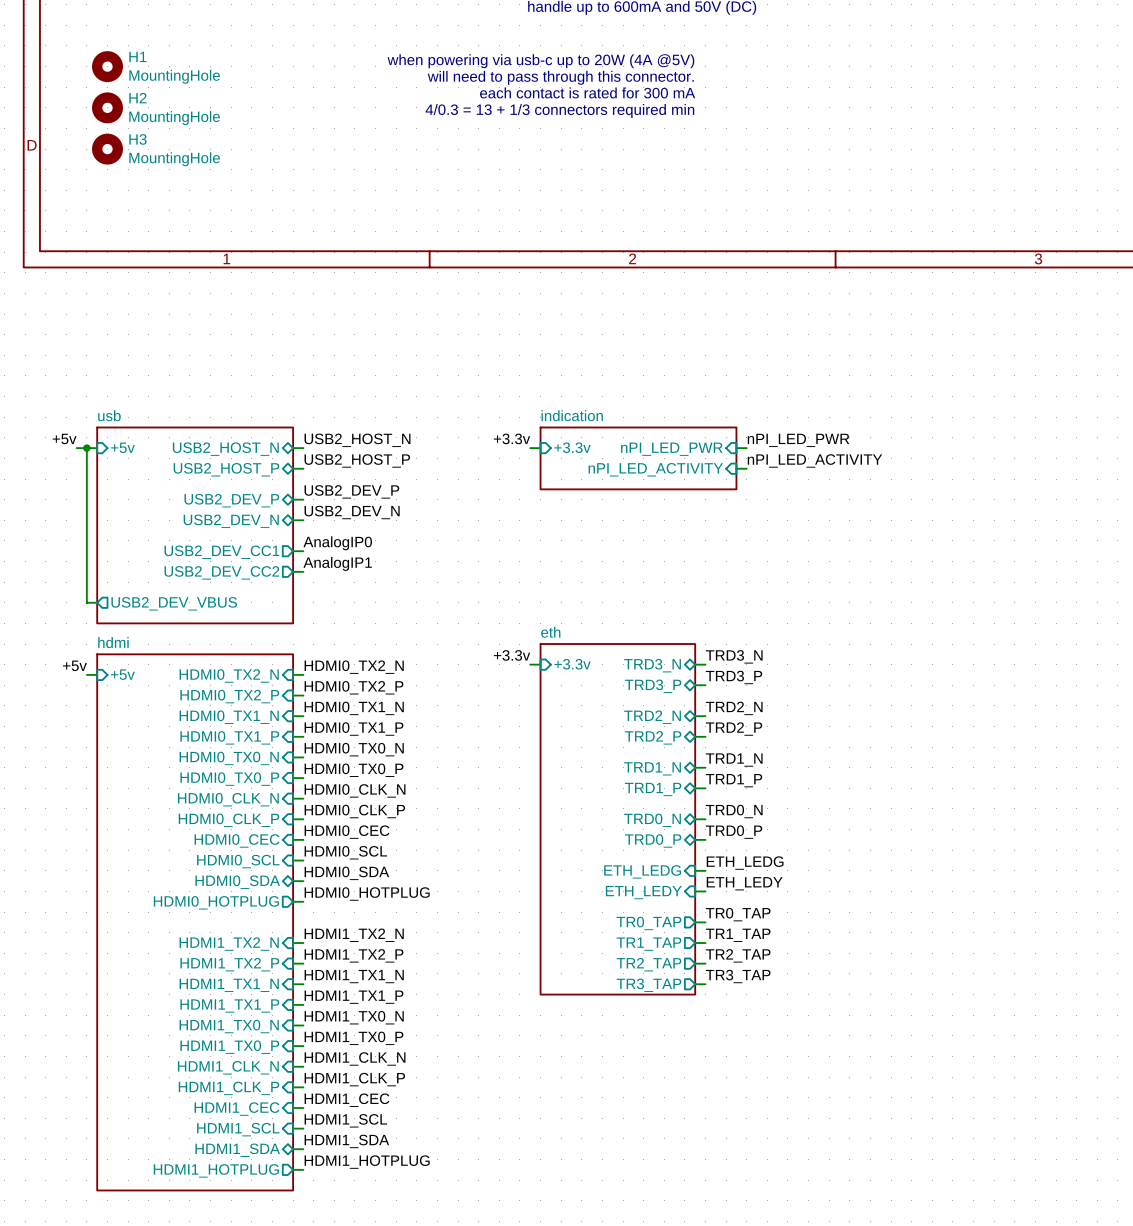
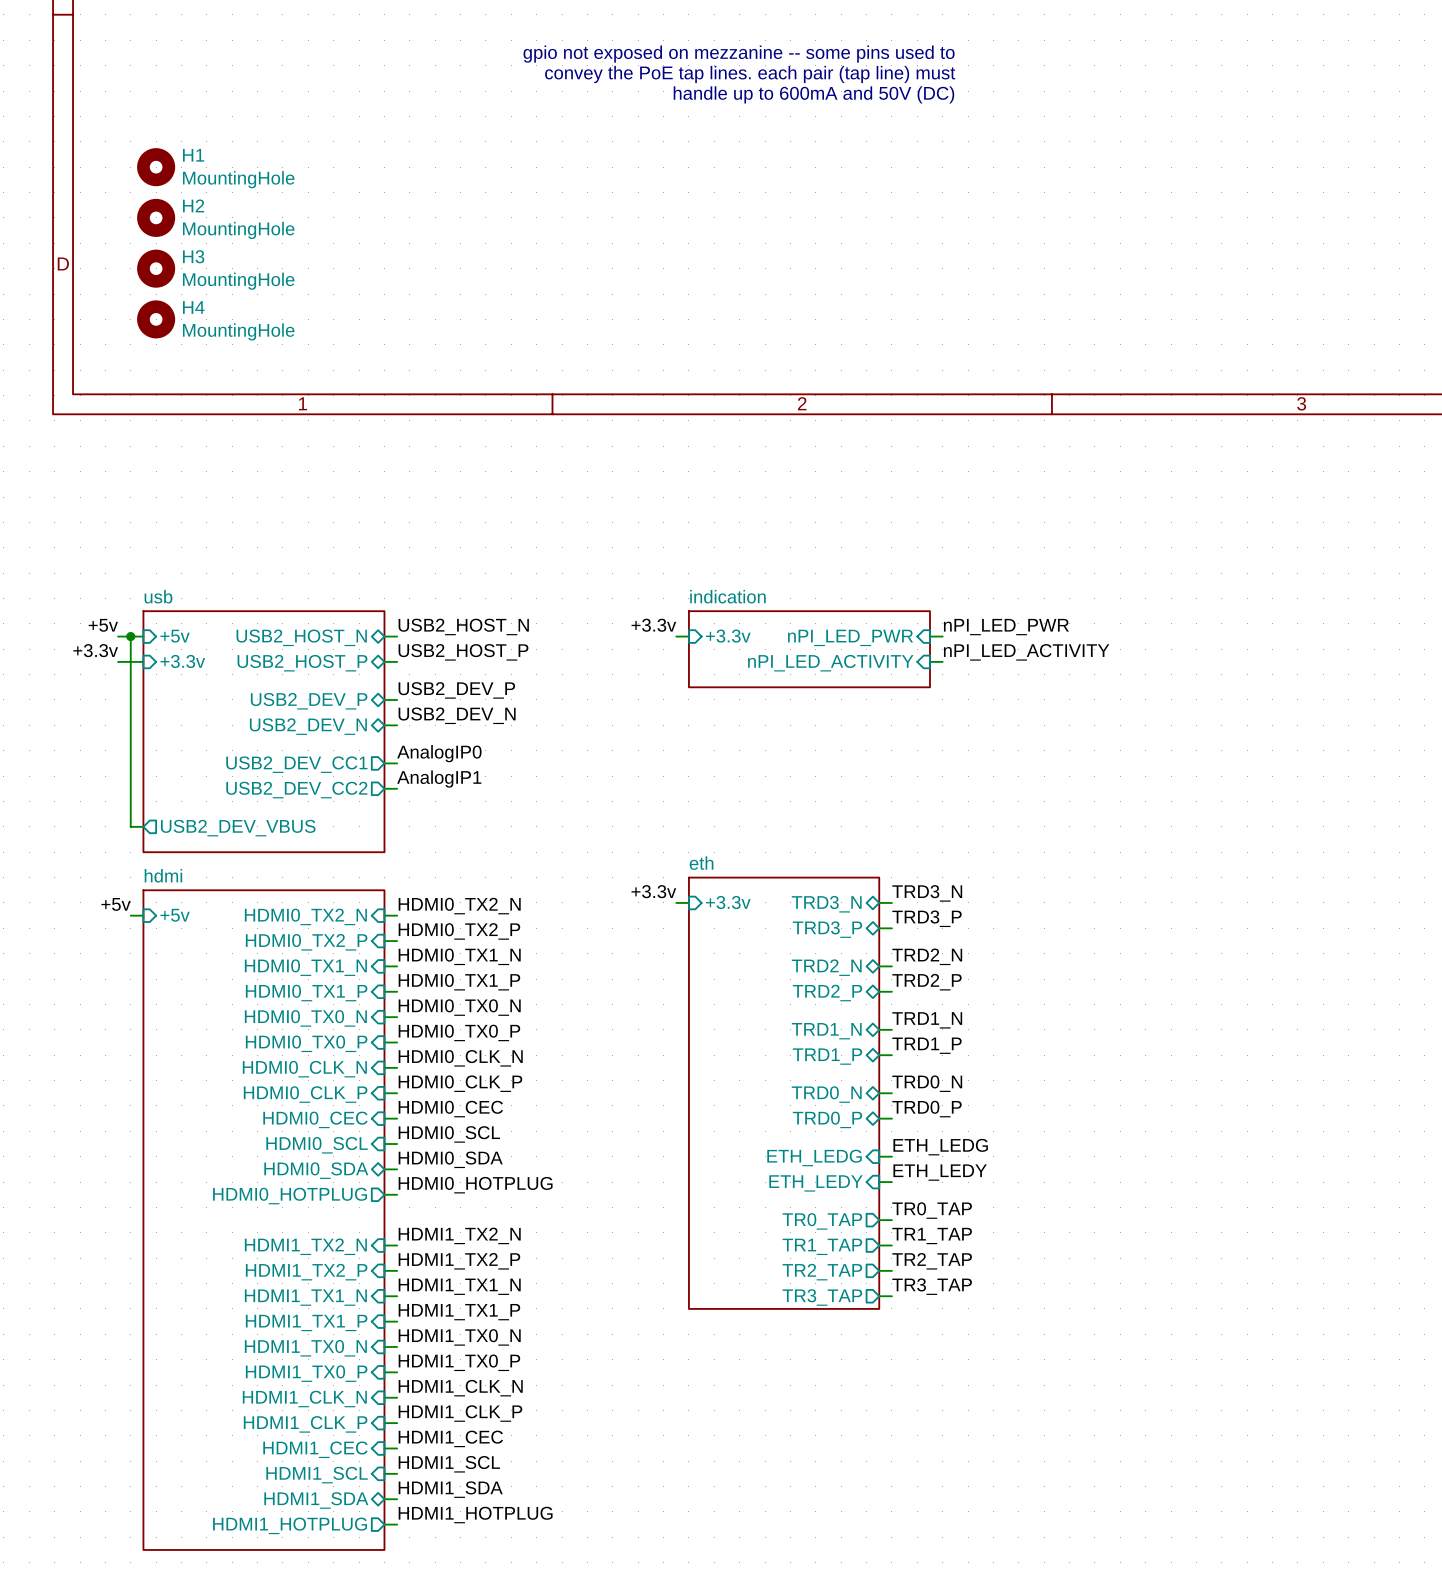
text: when powering via usb-c up to 20W (4A @5V) (540, 61) -> none
text: will need to pass through this connector. (560, 77) -> none
text: each contact is rated for 300 mA (587, 92) -> none
text: 4/0.3 = 13 + 1/3 connectors required min (559, 111) -> none
H4: none -> MountingHole (156, 319)
label: none -> +3.3v (95, 650)
wire: none -> (118, 661) (143, 661)
sheet pin: none -> +3.3v (182, 661)

